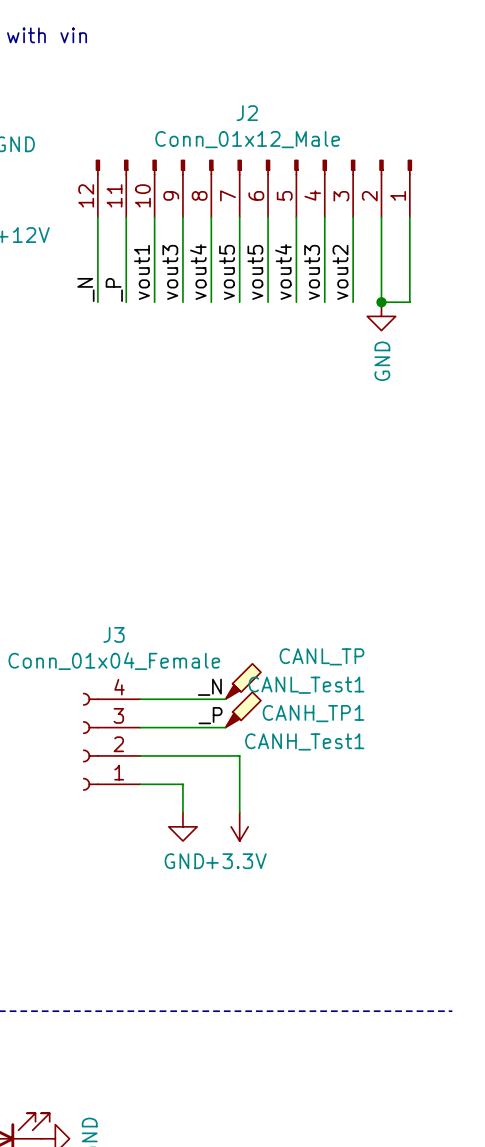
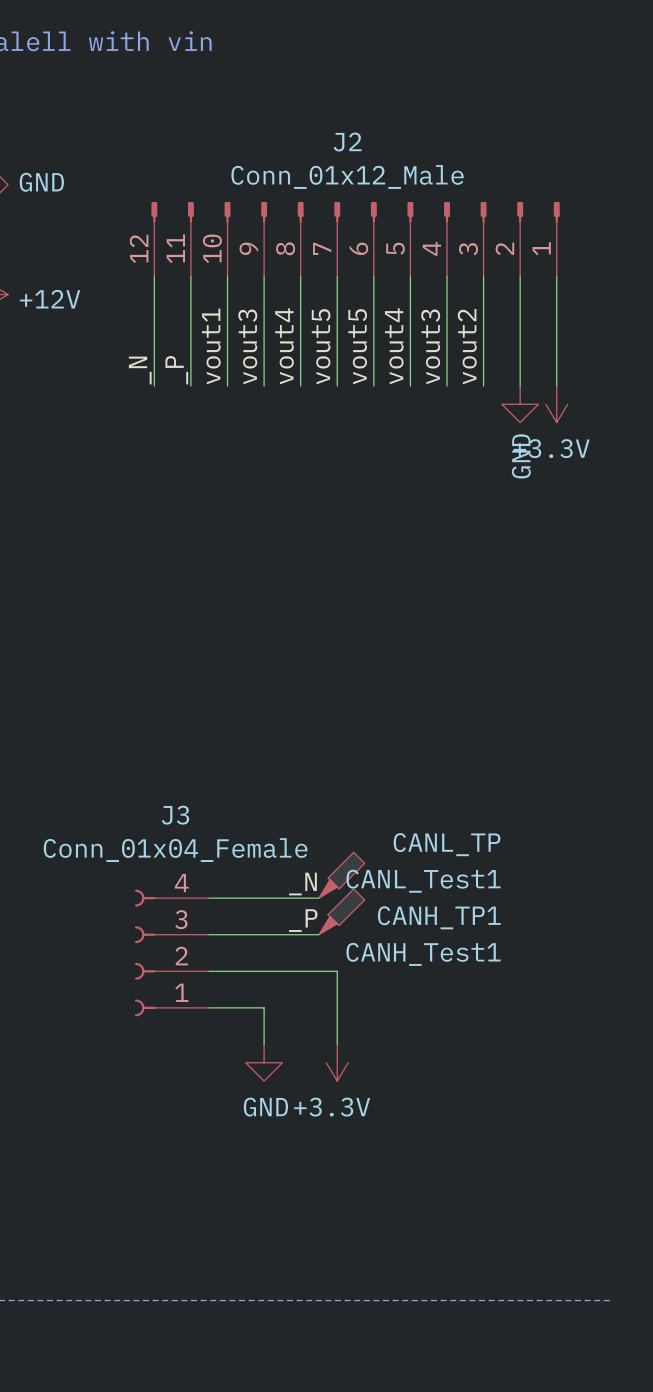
wire: (381, 302) (409, 302) -> none
junction: (381, 302) -> none
power symbol: none -> +3.3V (556, 404)

